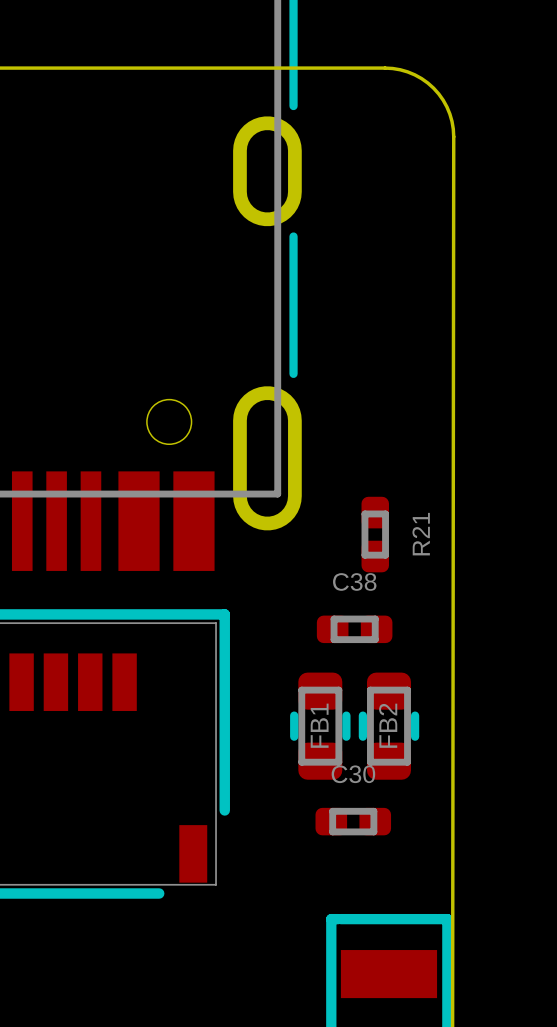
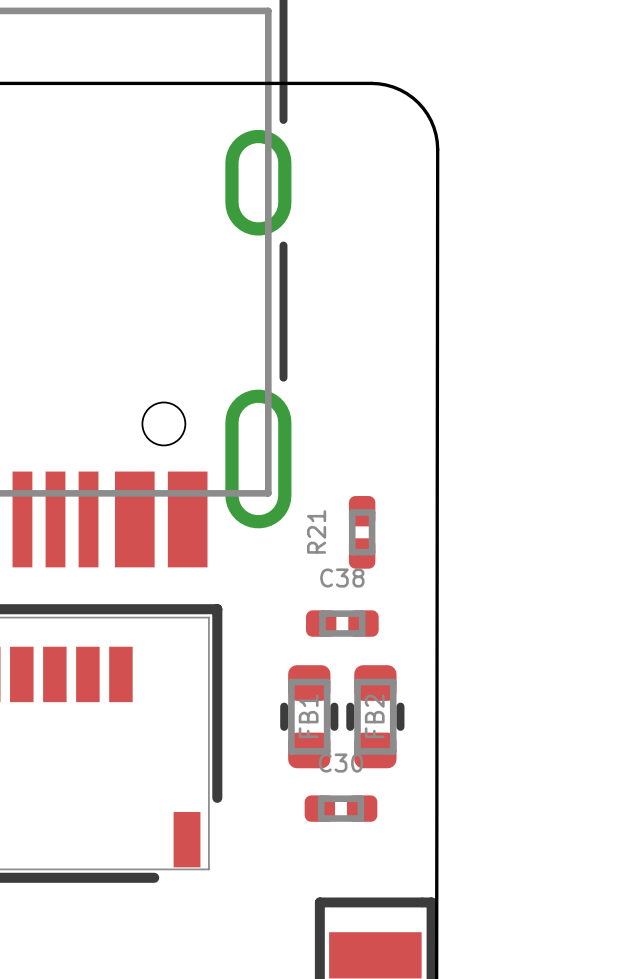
R21 name position: R21 (421, 534) -> R21 (316, 531)

